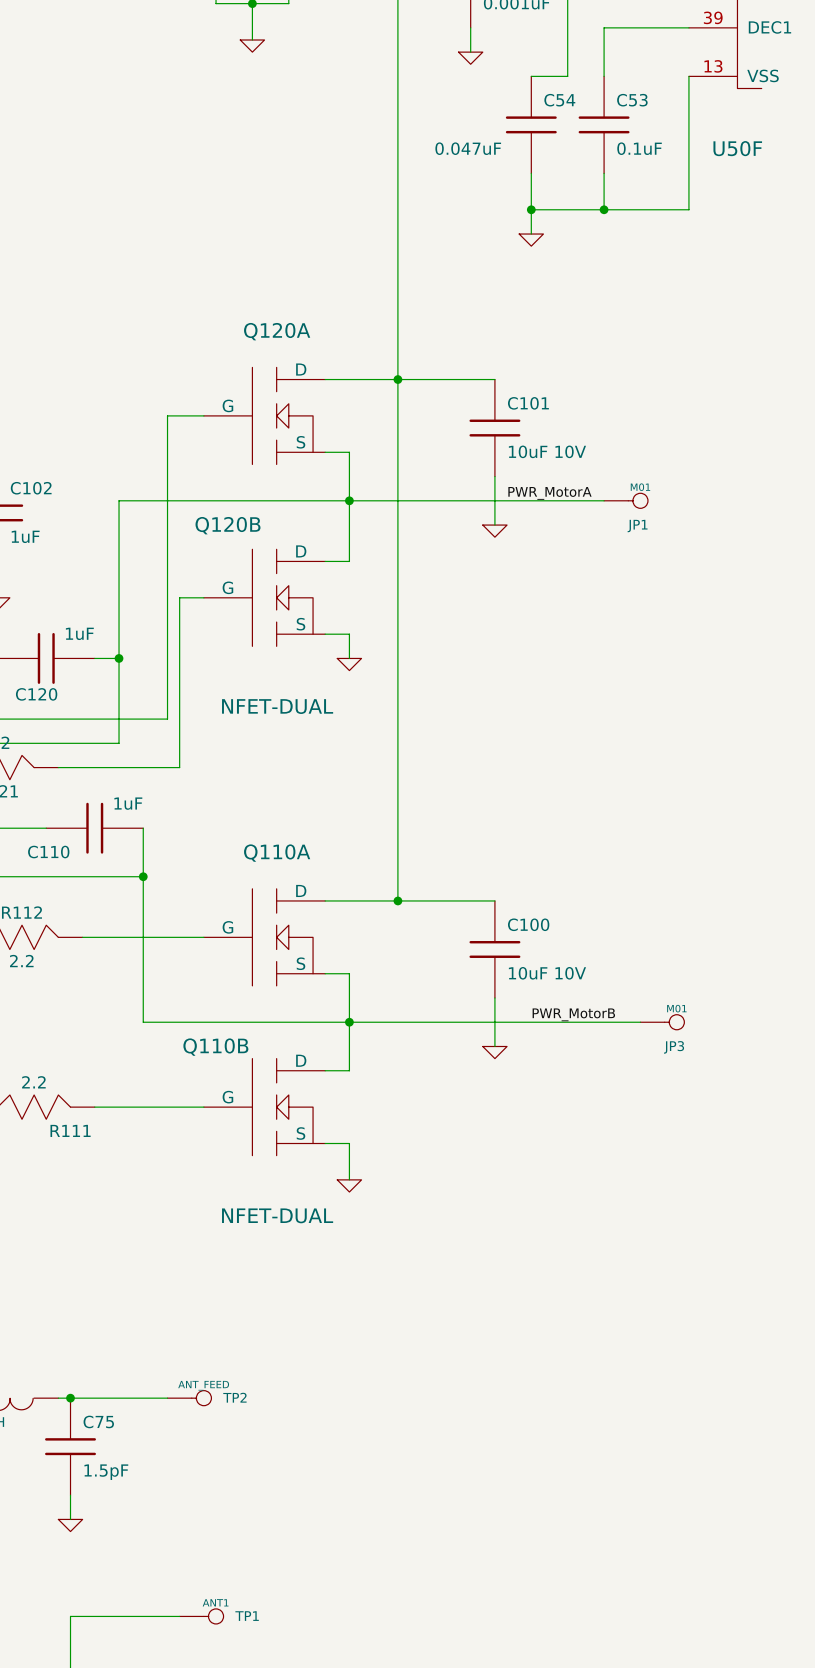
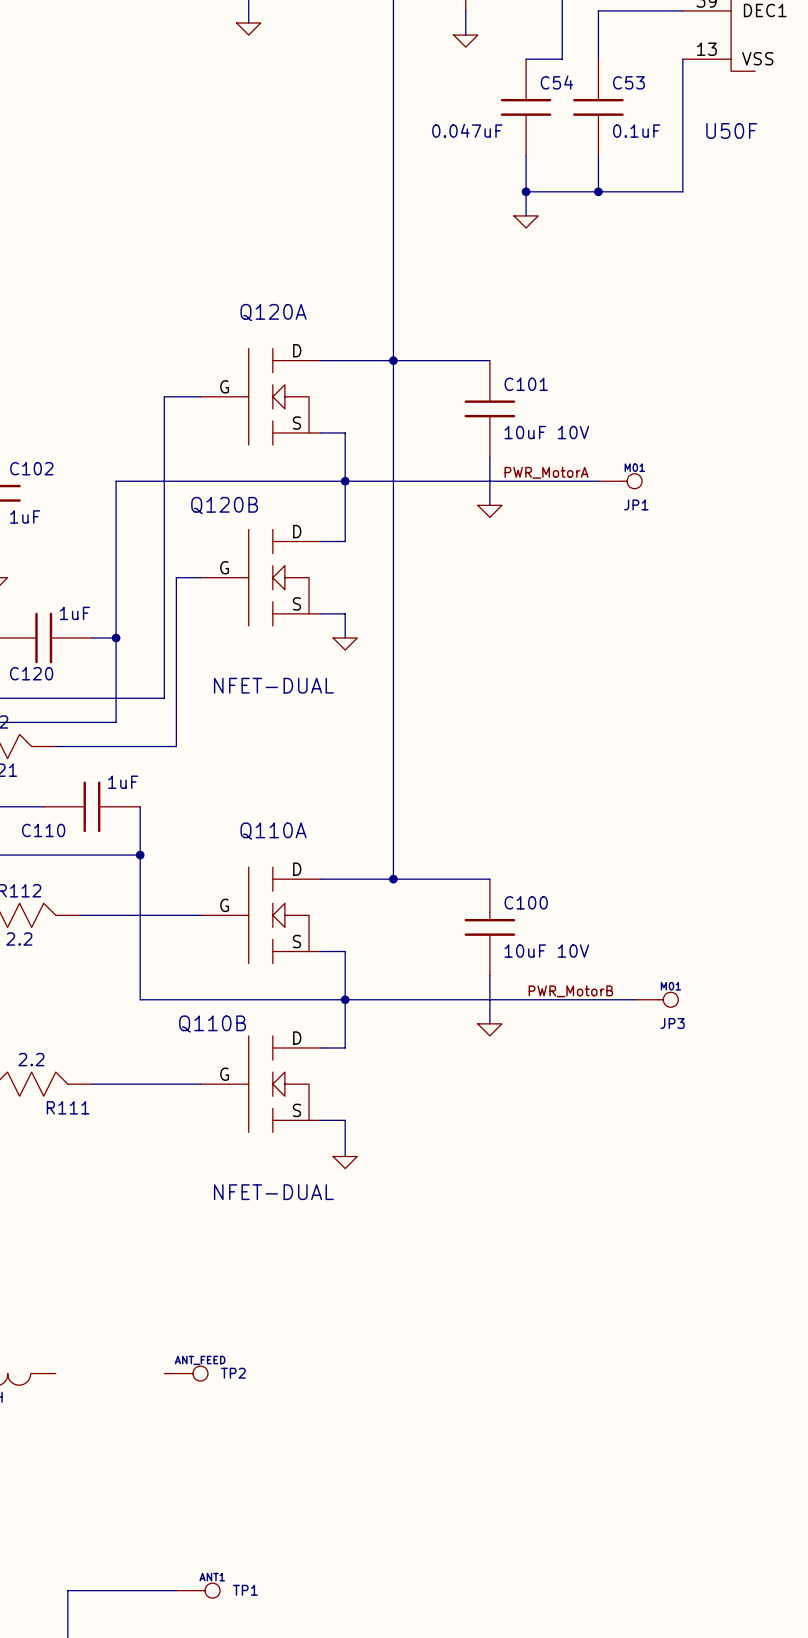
wire: (58, 1398) (167, 1398) -> none
junction: (70, 1398) -> none
C75: 1.5pF (70, 1446) -> none
wire: (70, 1495) (70, 1519) -> none
power symbol: (70, 1525) -> none

